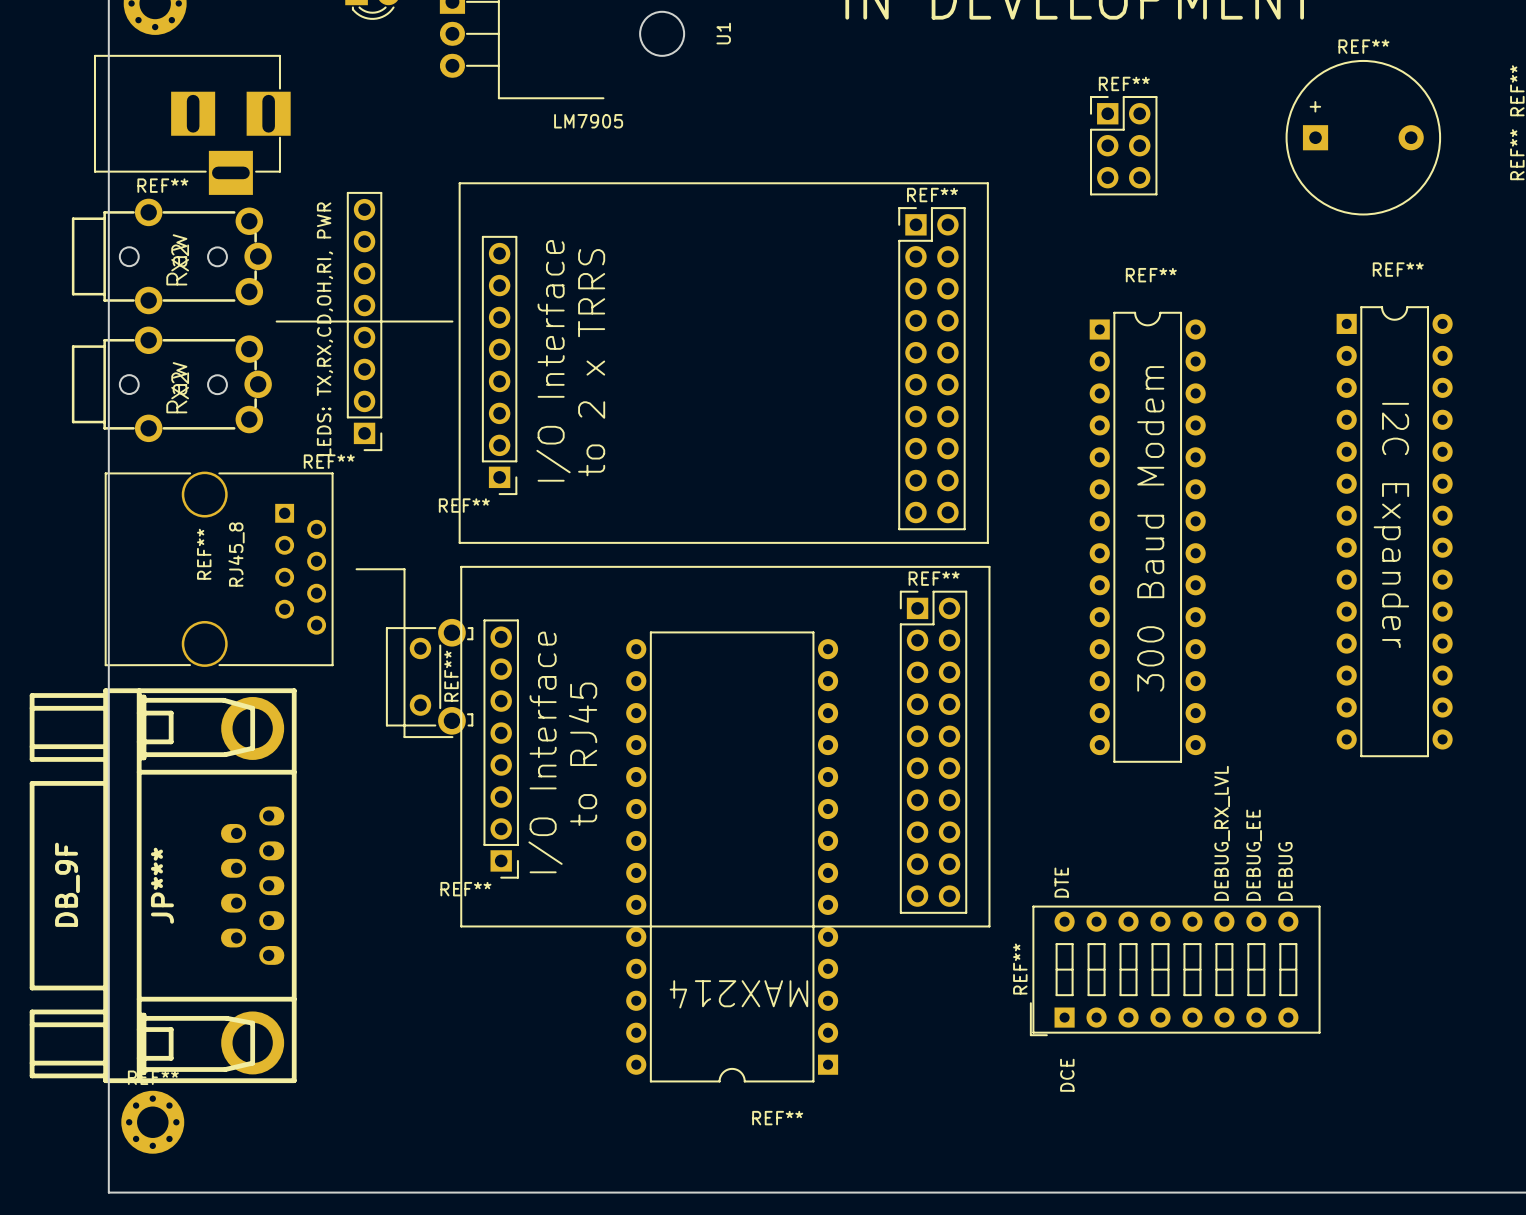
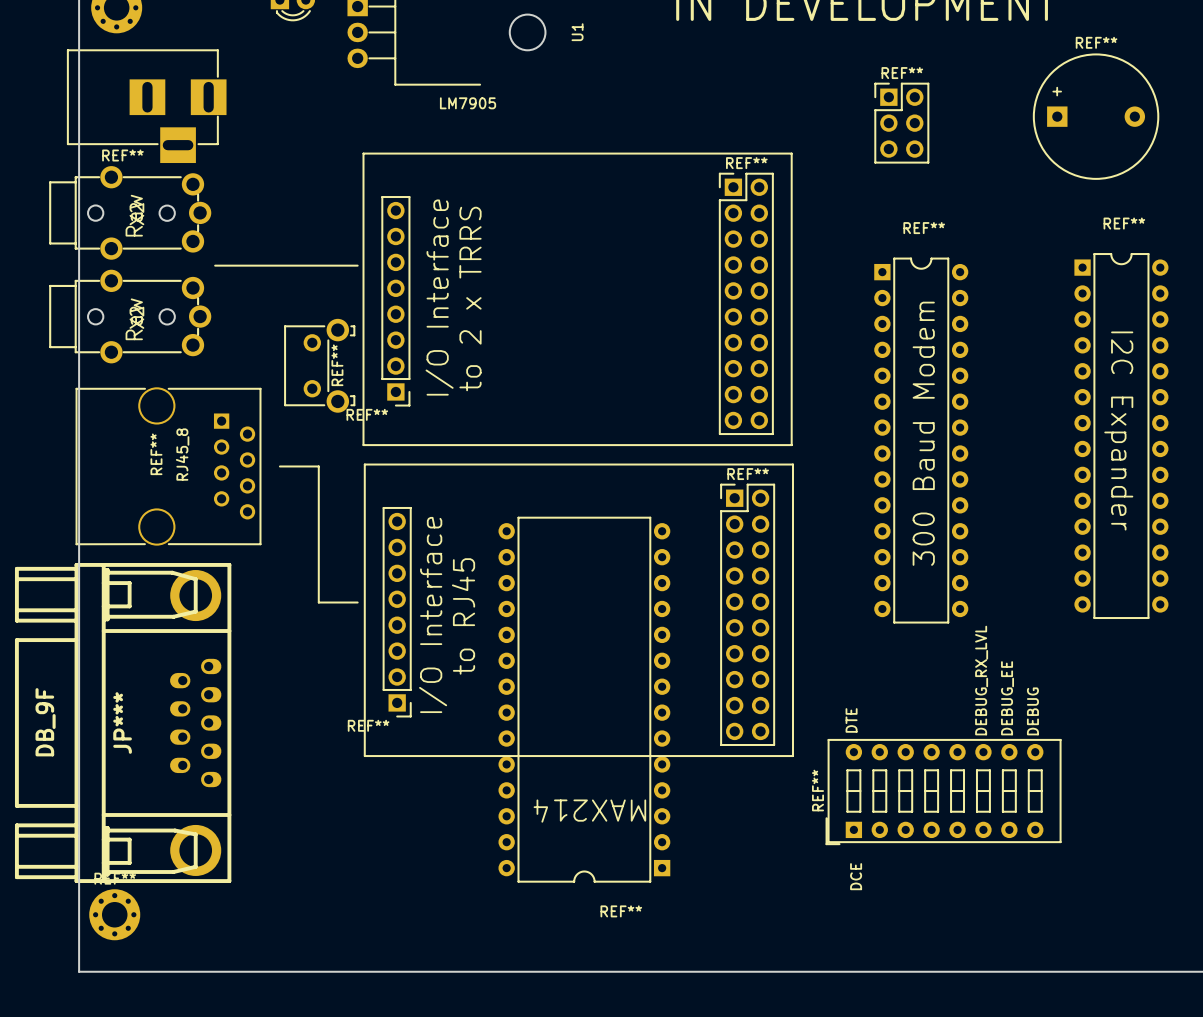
REF**: (364, 321) -> none
text: LEDS: TX,RX,CD,OH,RI, PWR (325, 329) -> none
REF** position: (429, 676) -> (319, 365)

